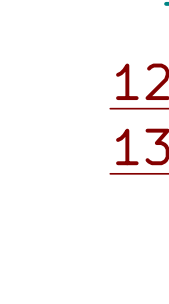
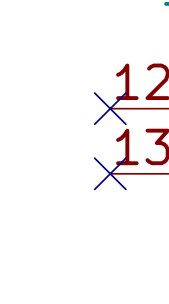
no-connect mark: none -> (110, 108)
no-connect mark: none -> (110, 173)

